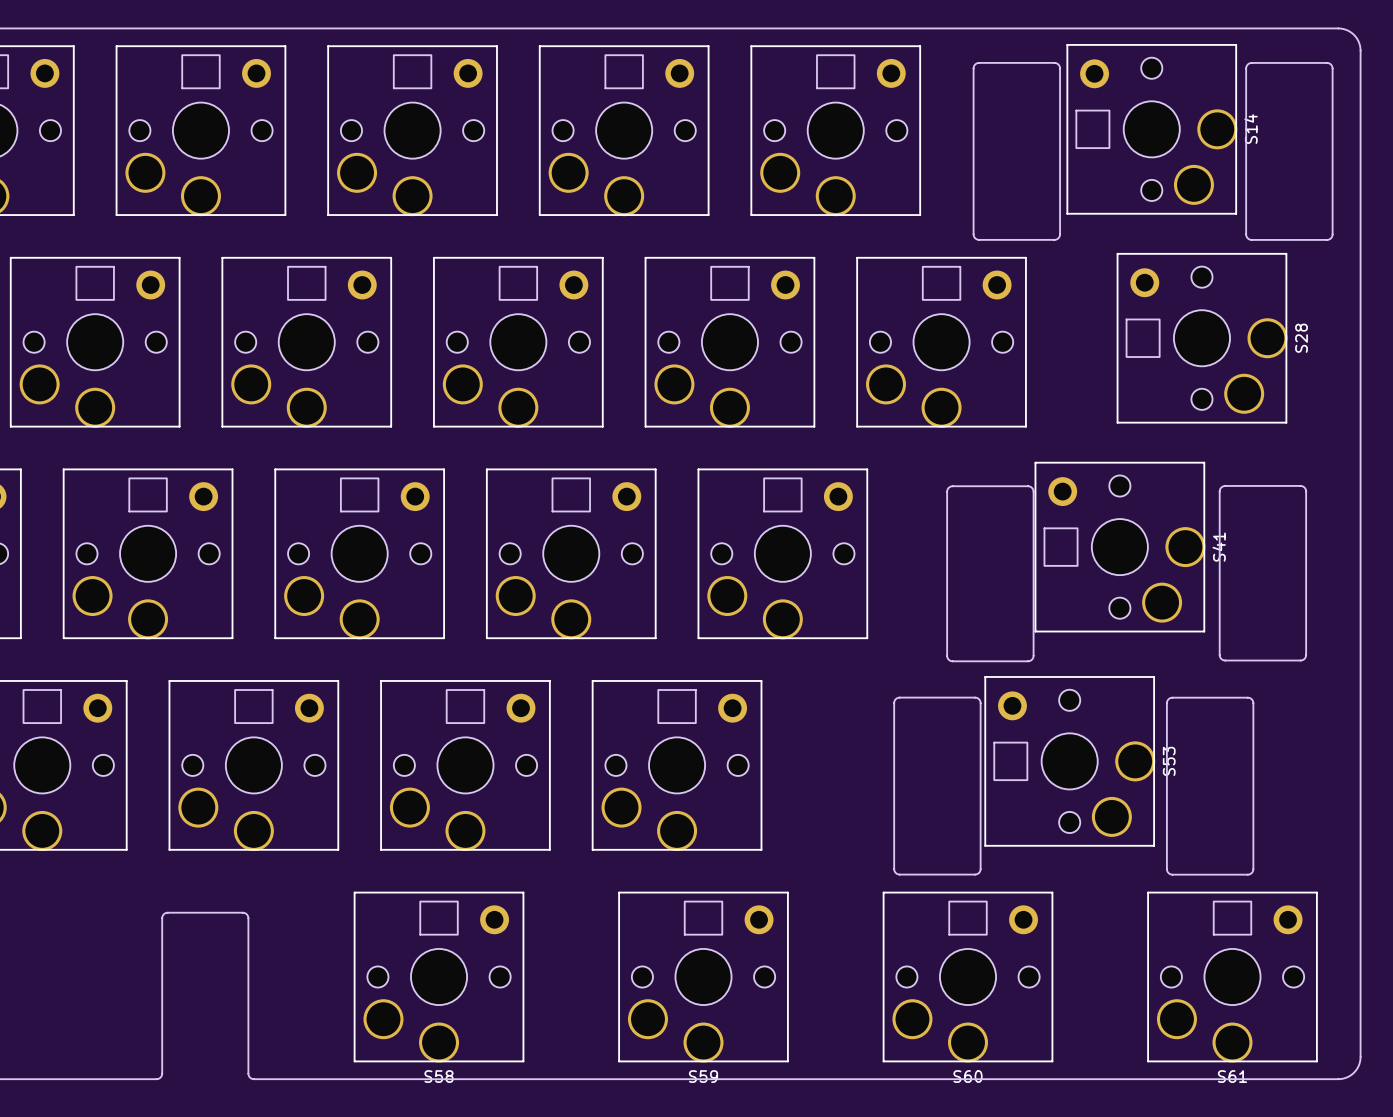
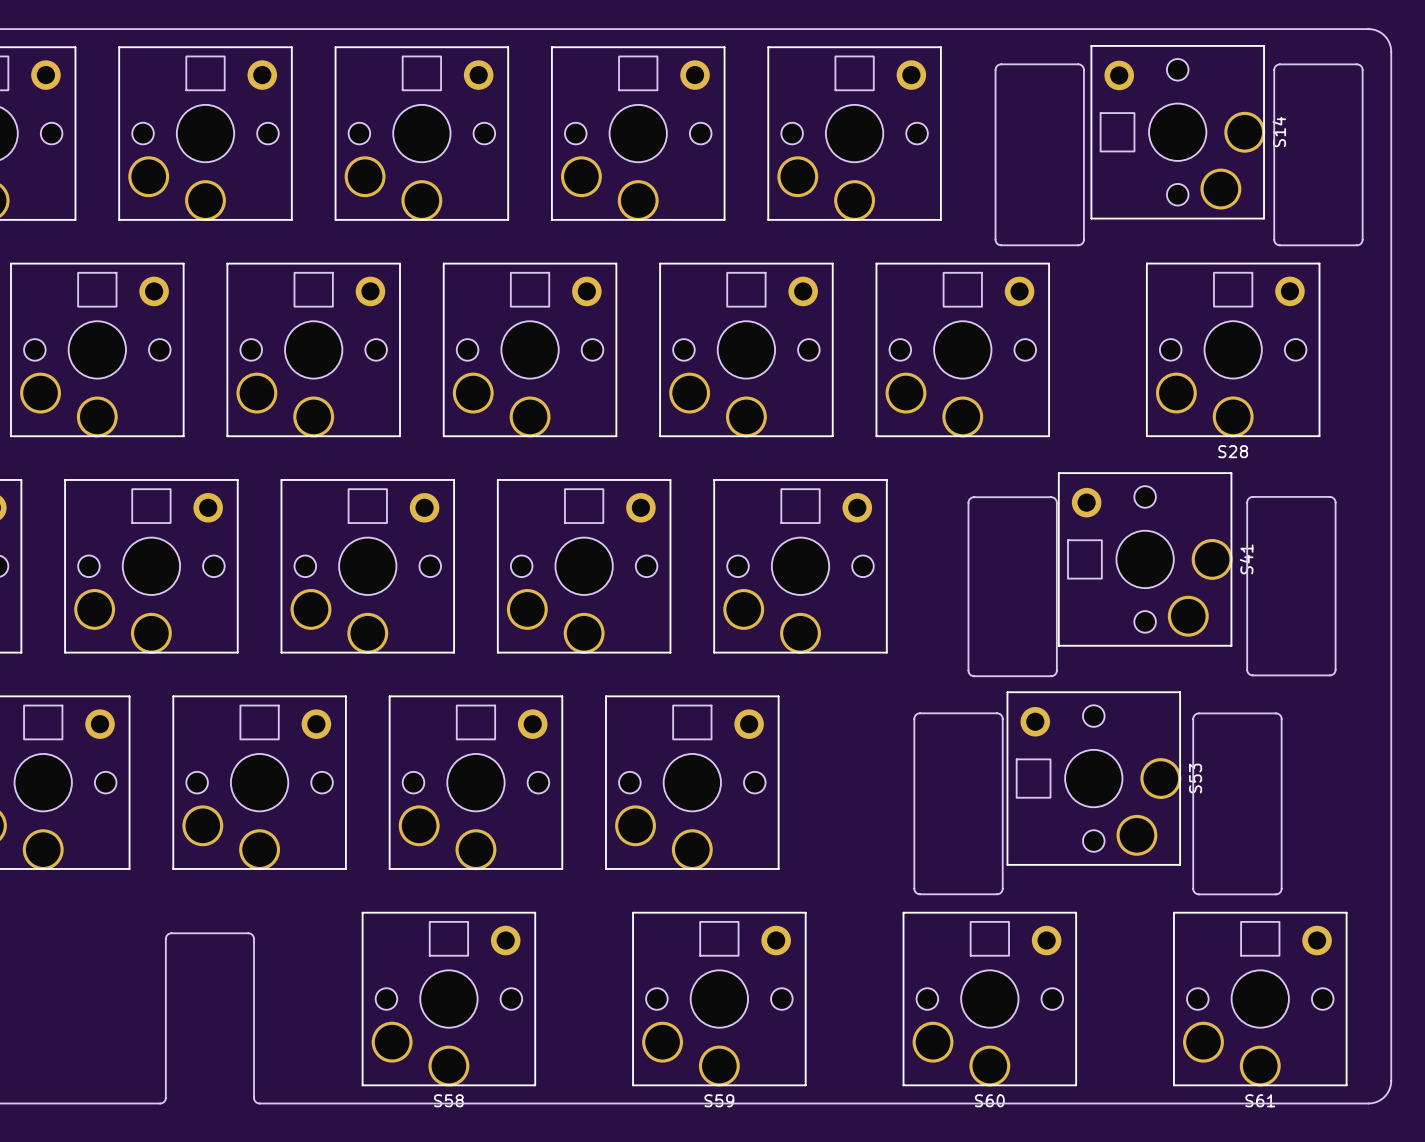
part rotation: 0° (1143, 338) -> 90° clockwise (1233, 289)
part position: (1143, 338) -> (1233, 289)
S28 rotation: 0° (1202, 338) -> 90° clockwise (1233, 350)

